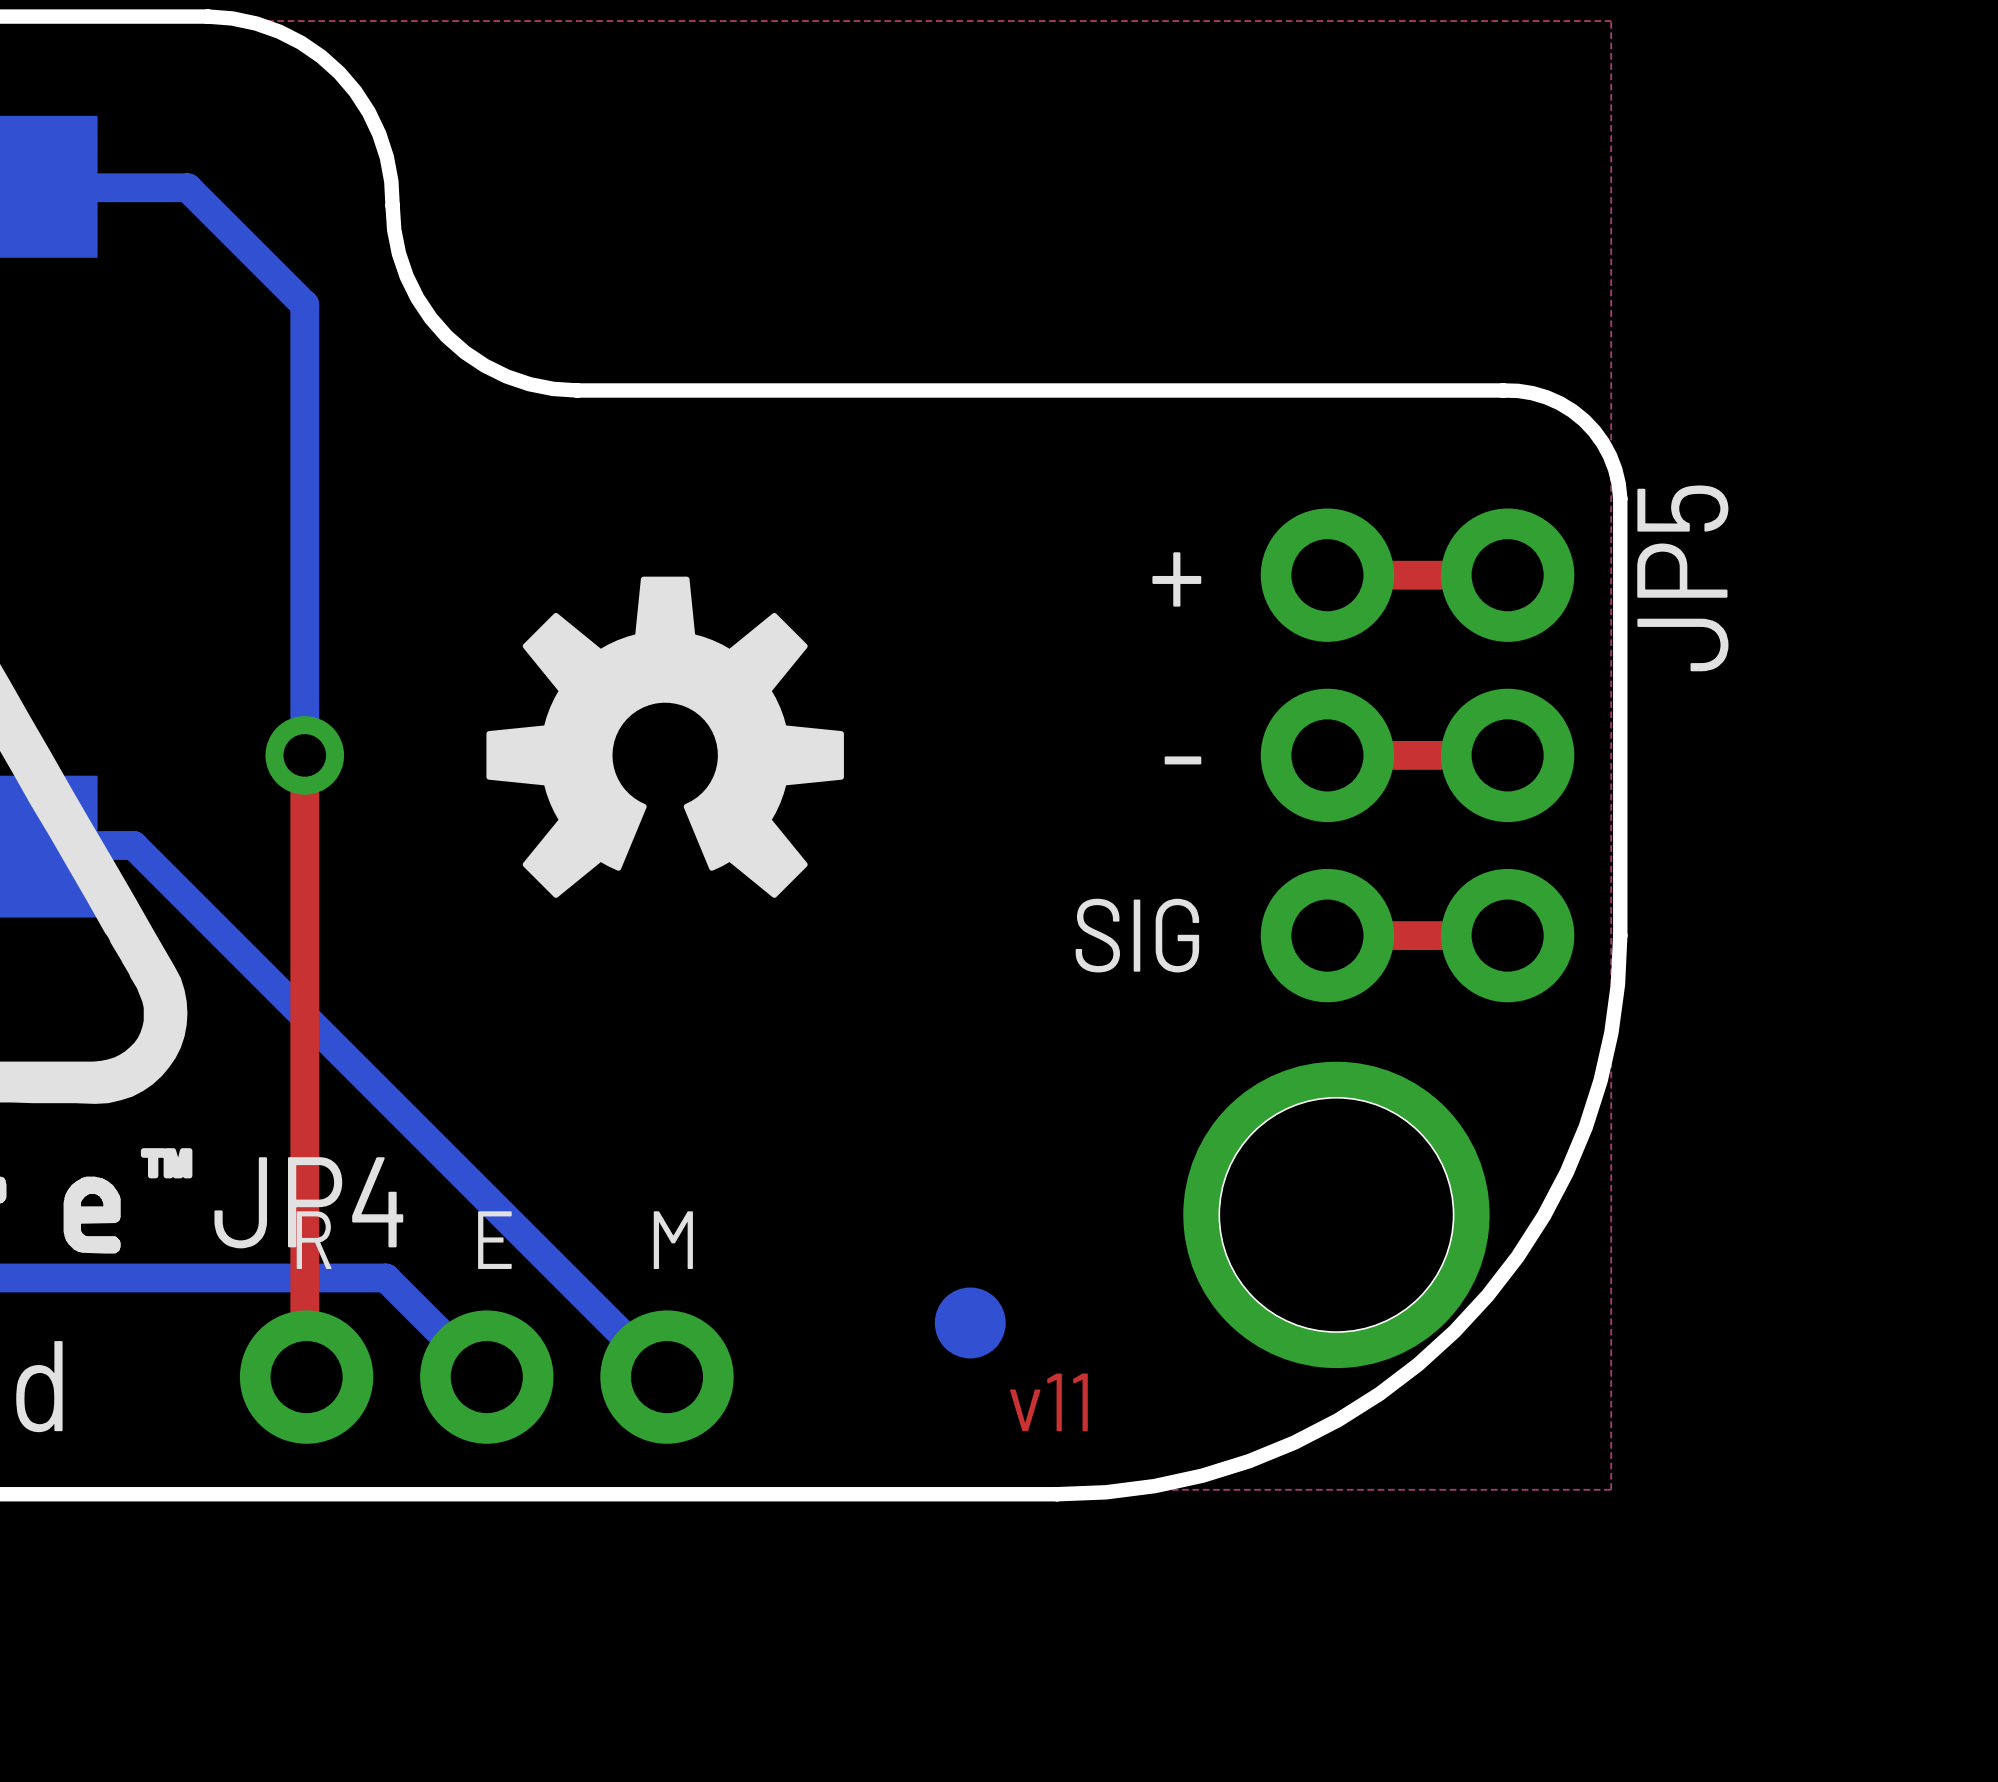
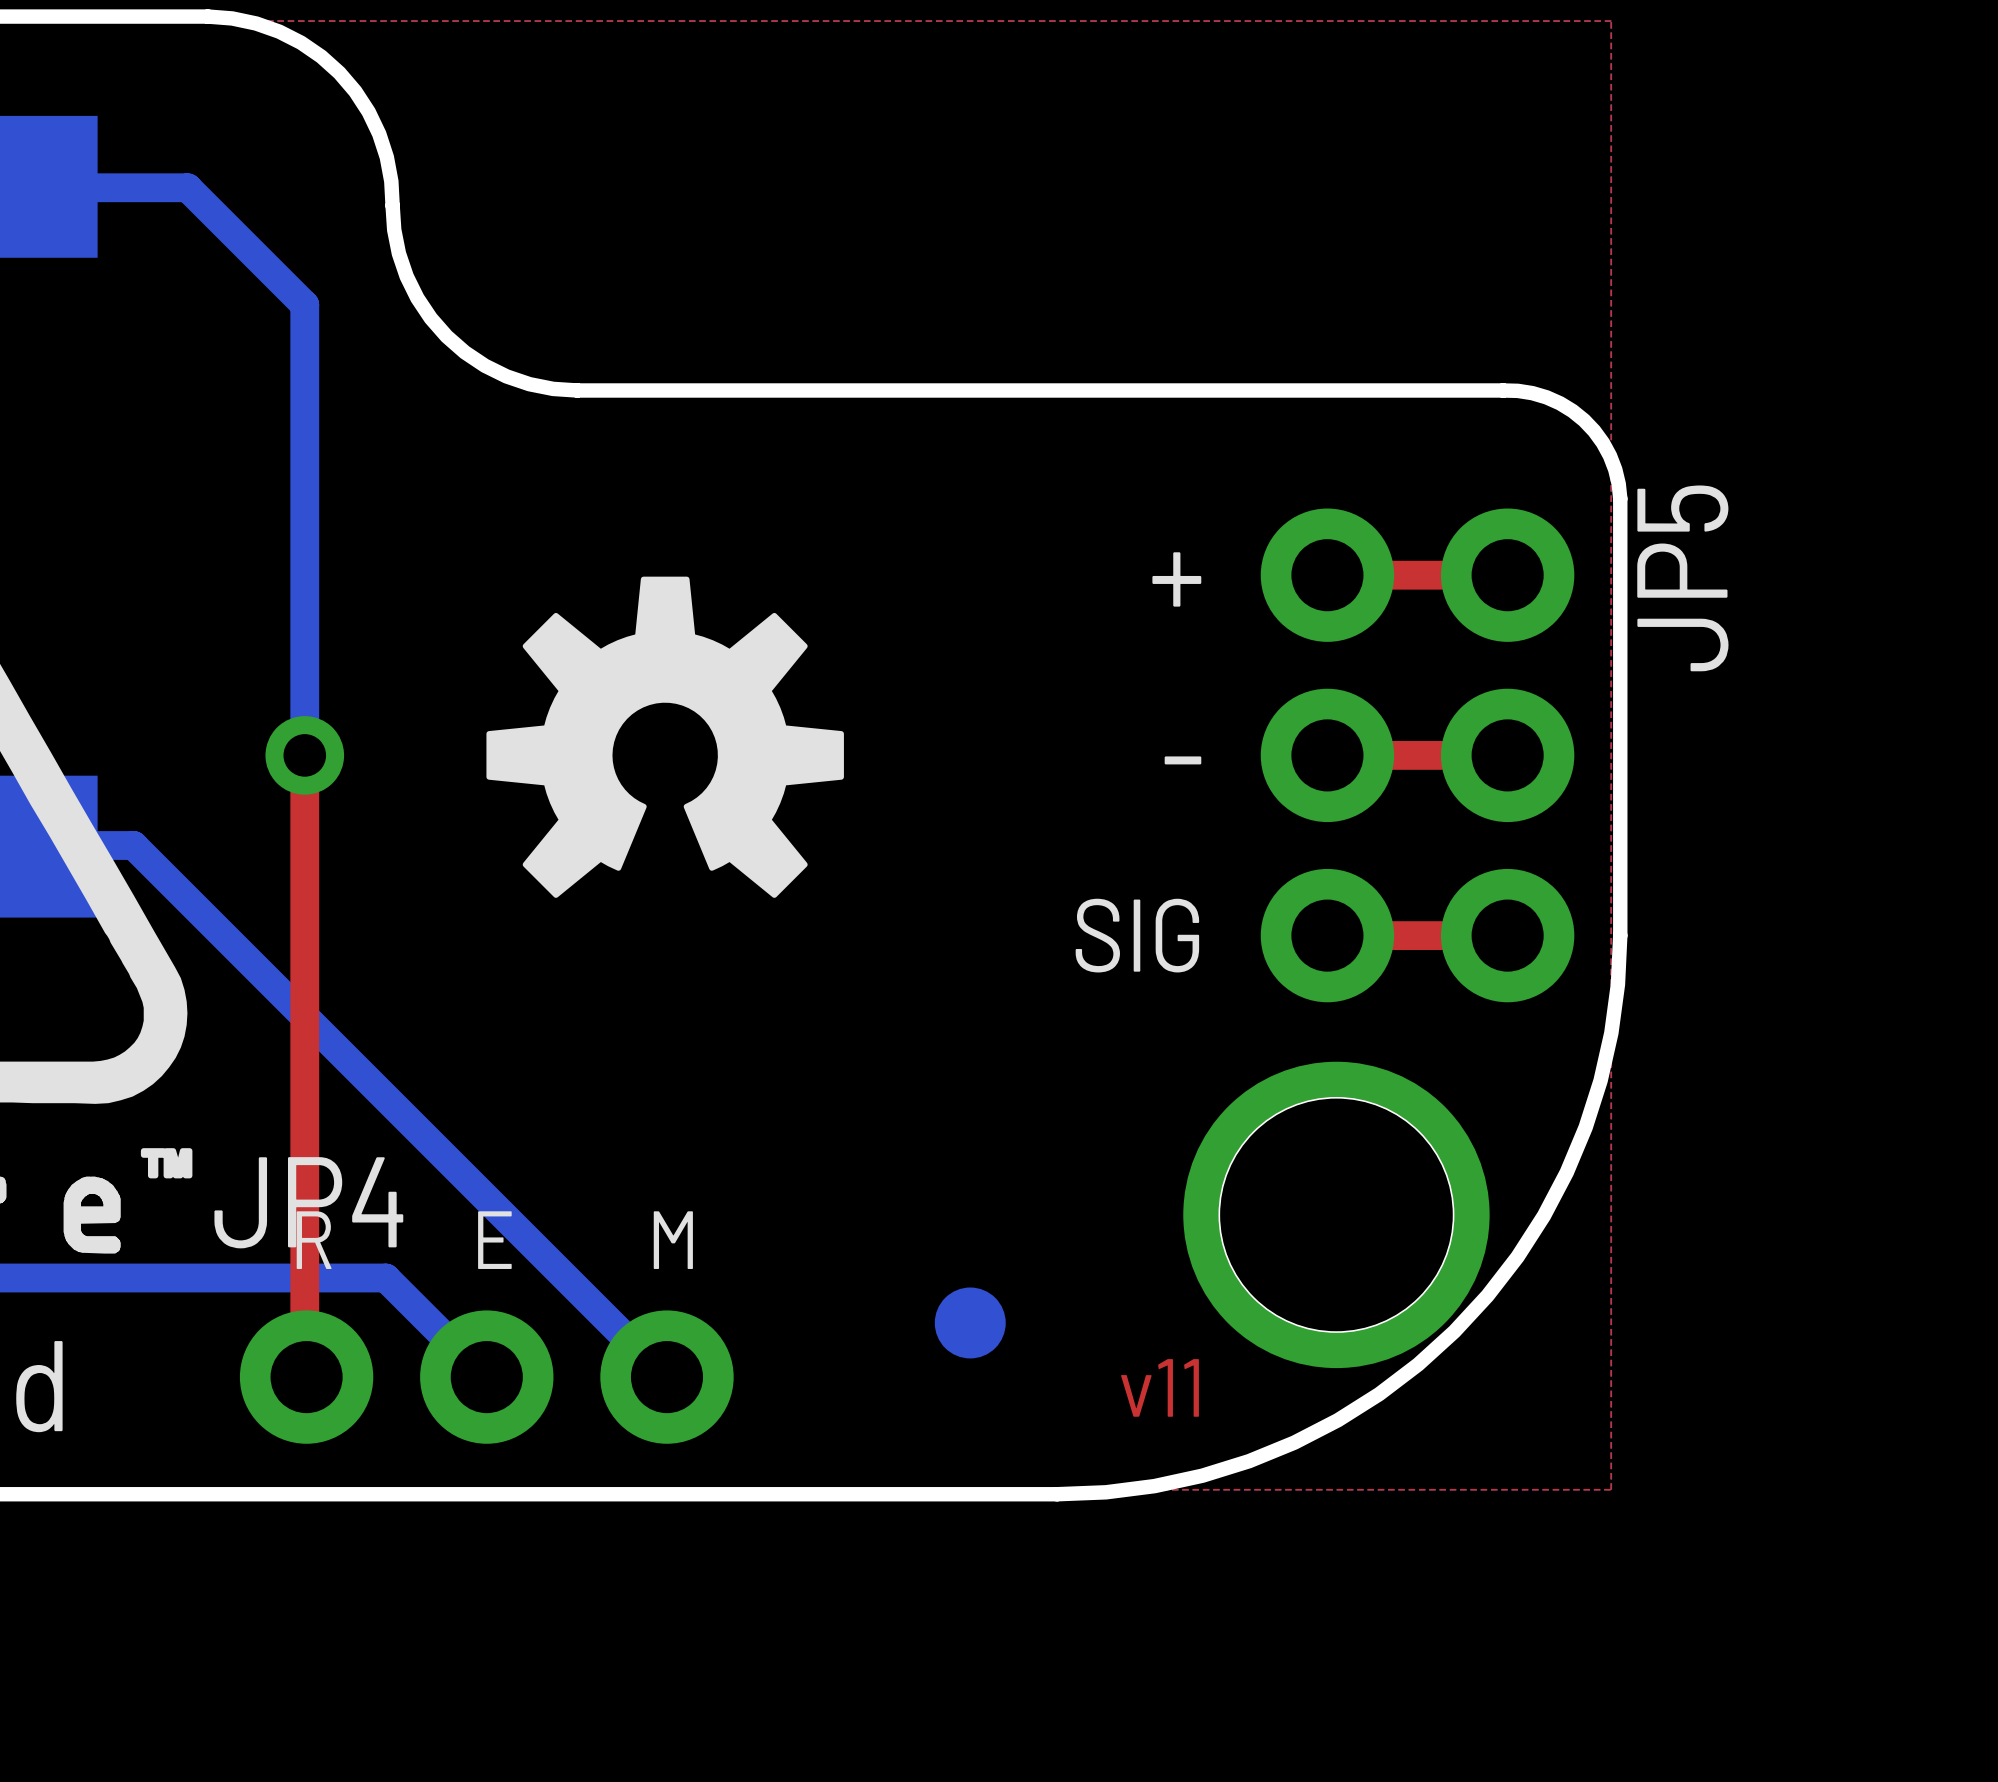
text position: v11 (1048, 1402) -> v11 (1159, 1387)

